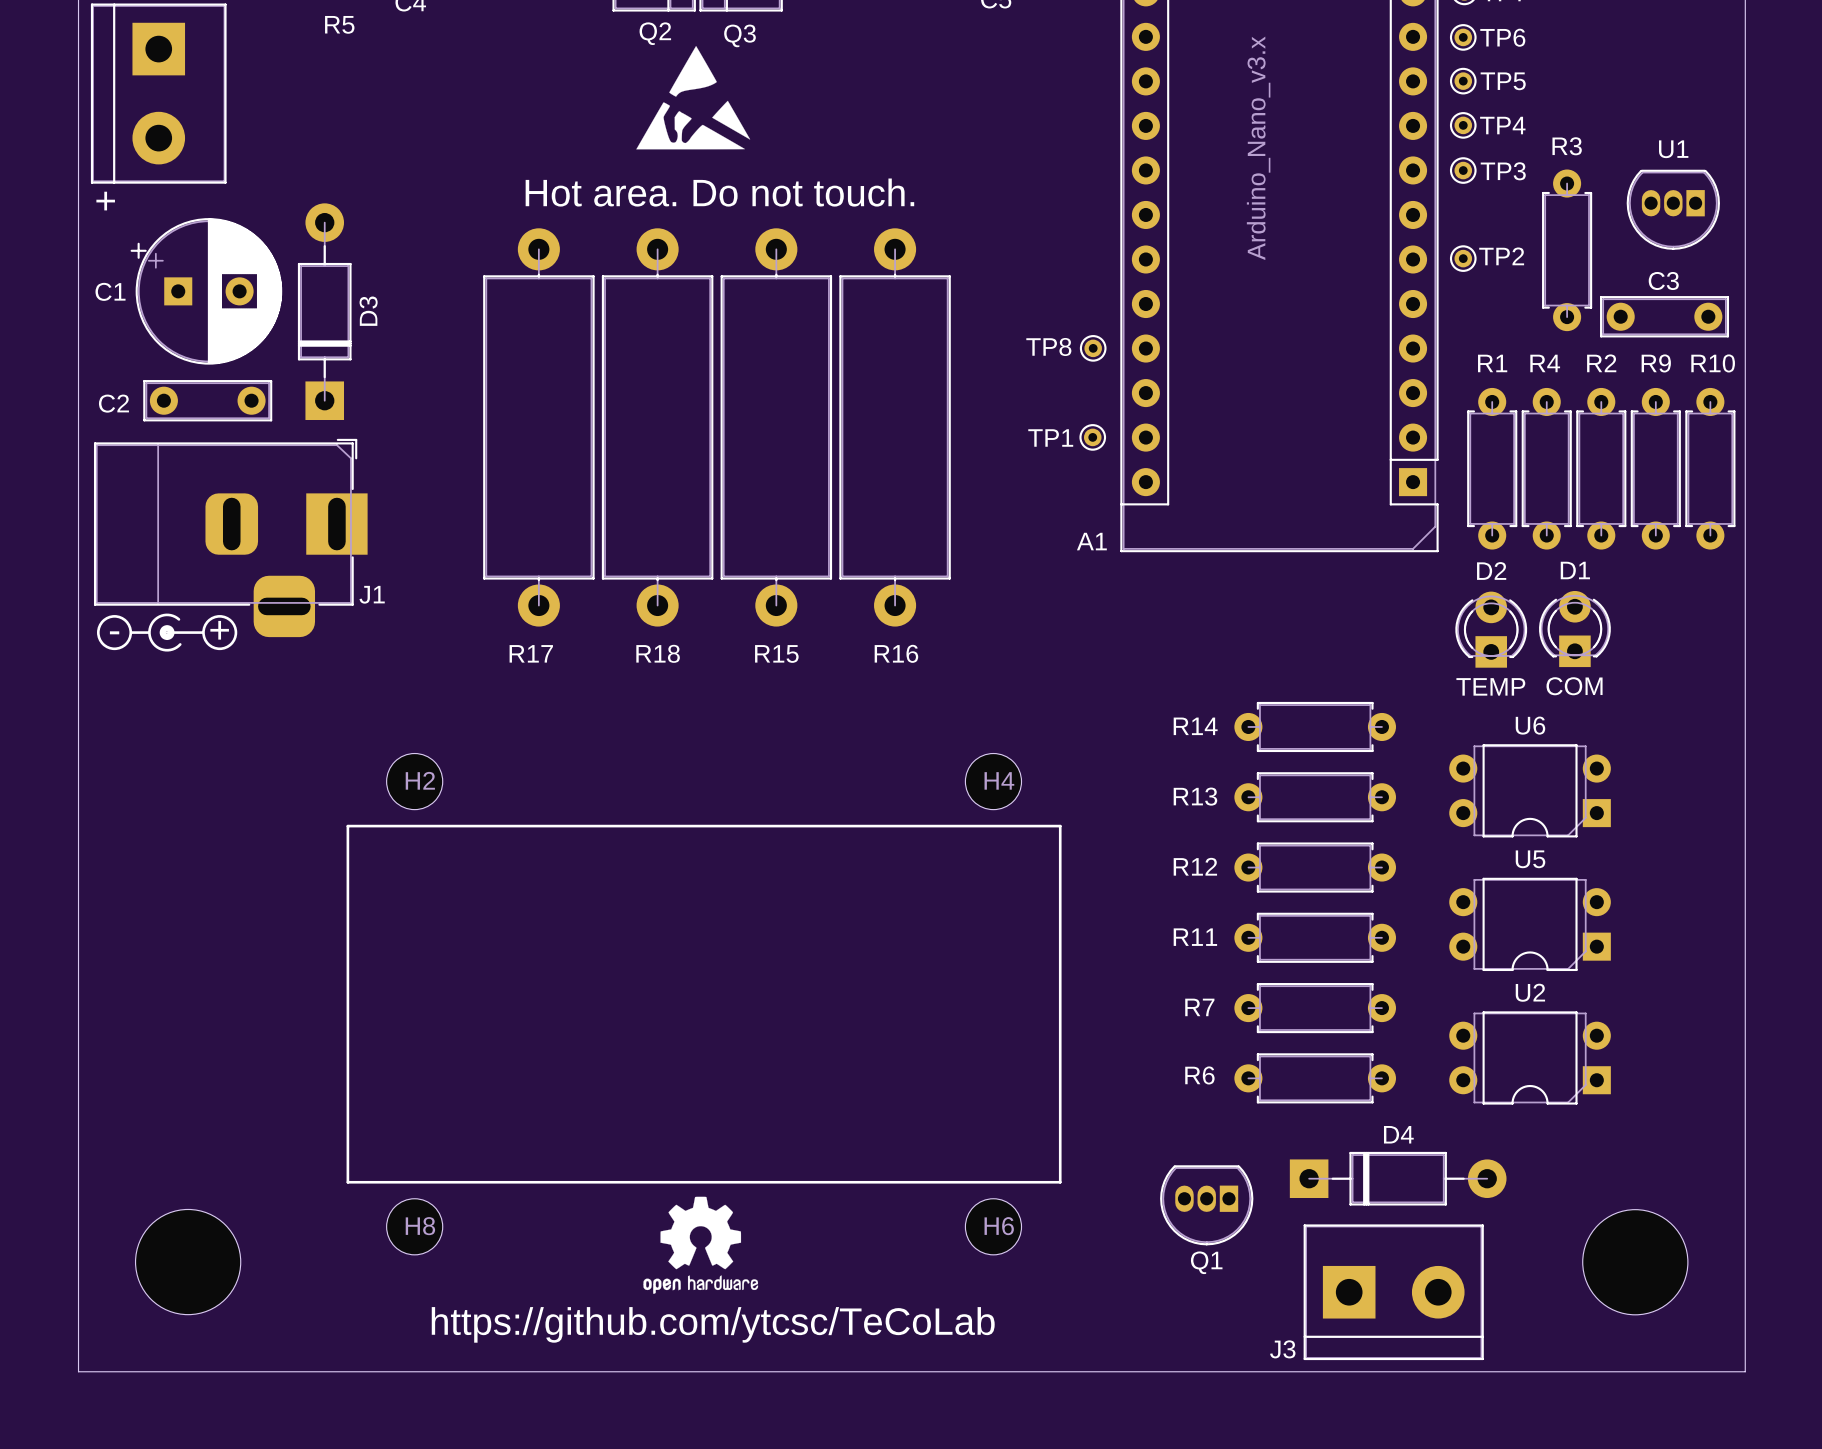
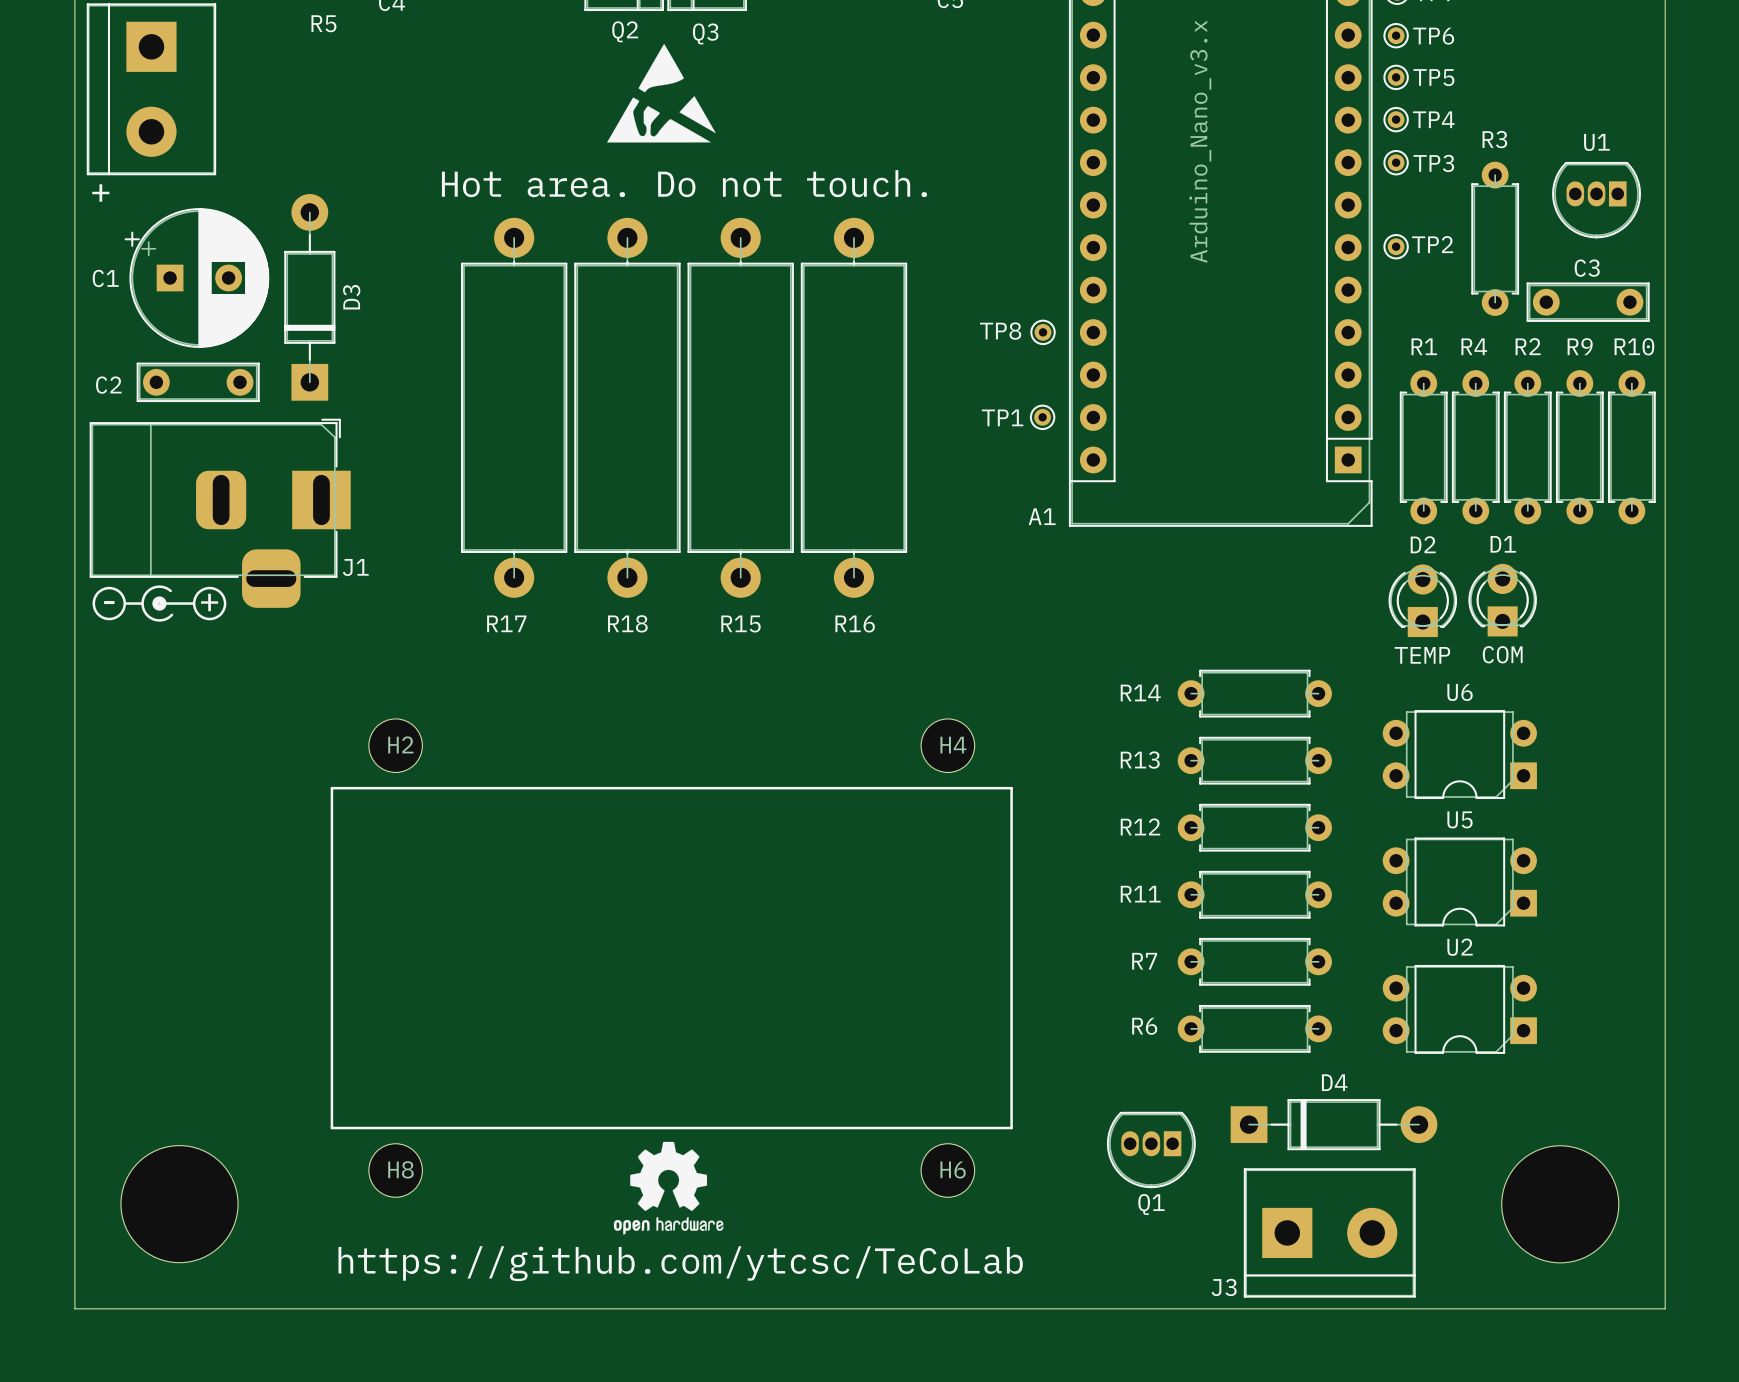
part footprint: [135, 1209, 241, 1315] -> [120, 1145, 239, 1263]
part footprint: [1582, 1209, 1688, 1315] -> [1501, 1145, 1619, 1263]

